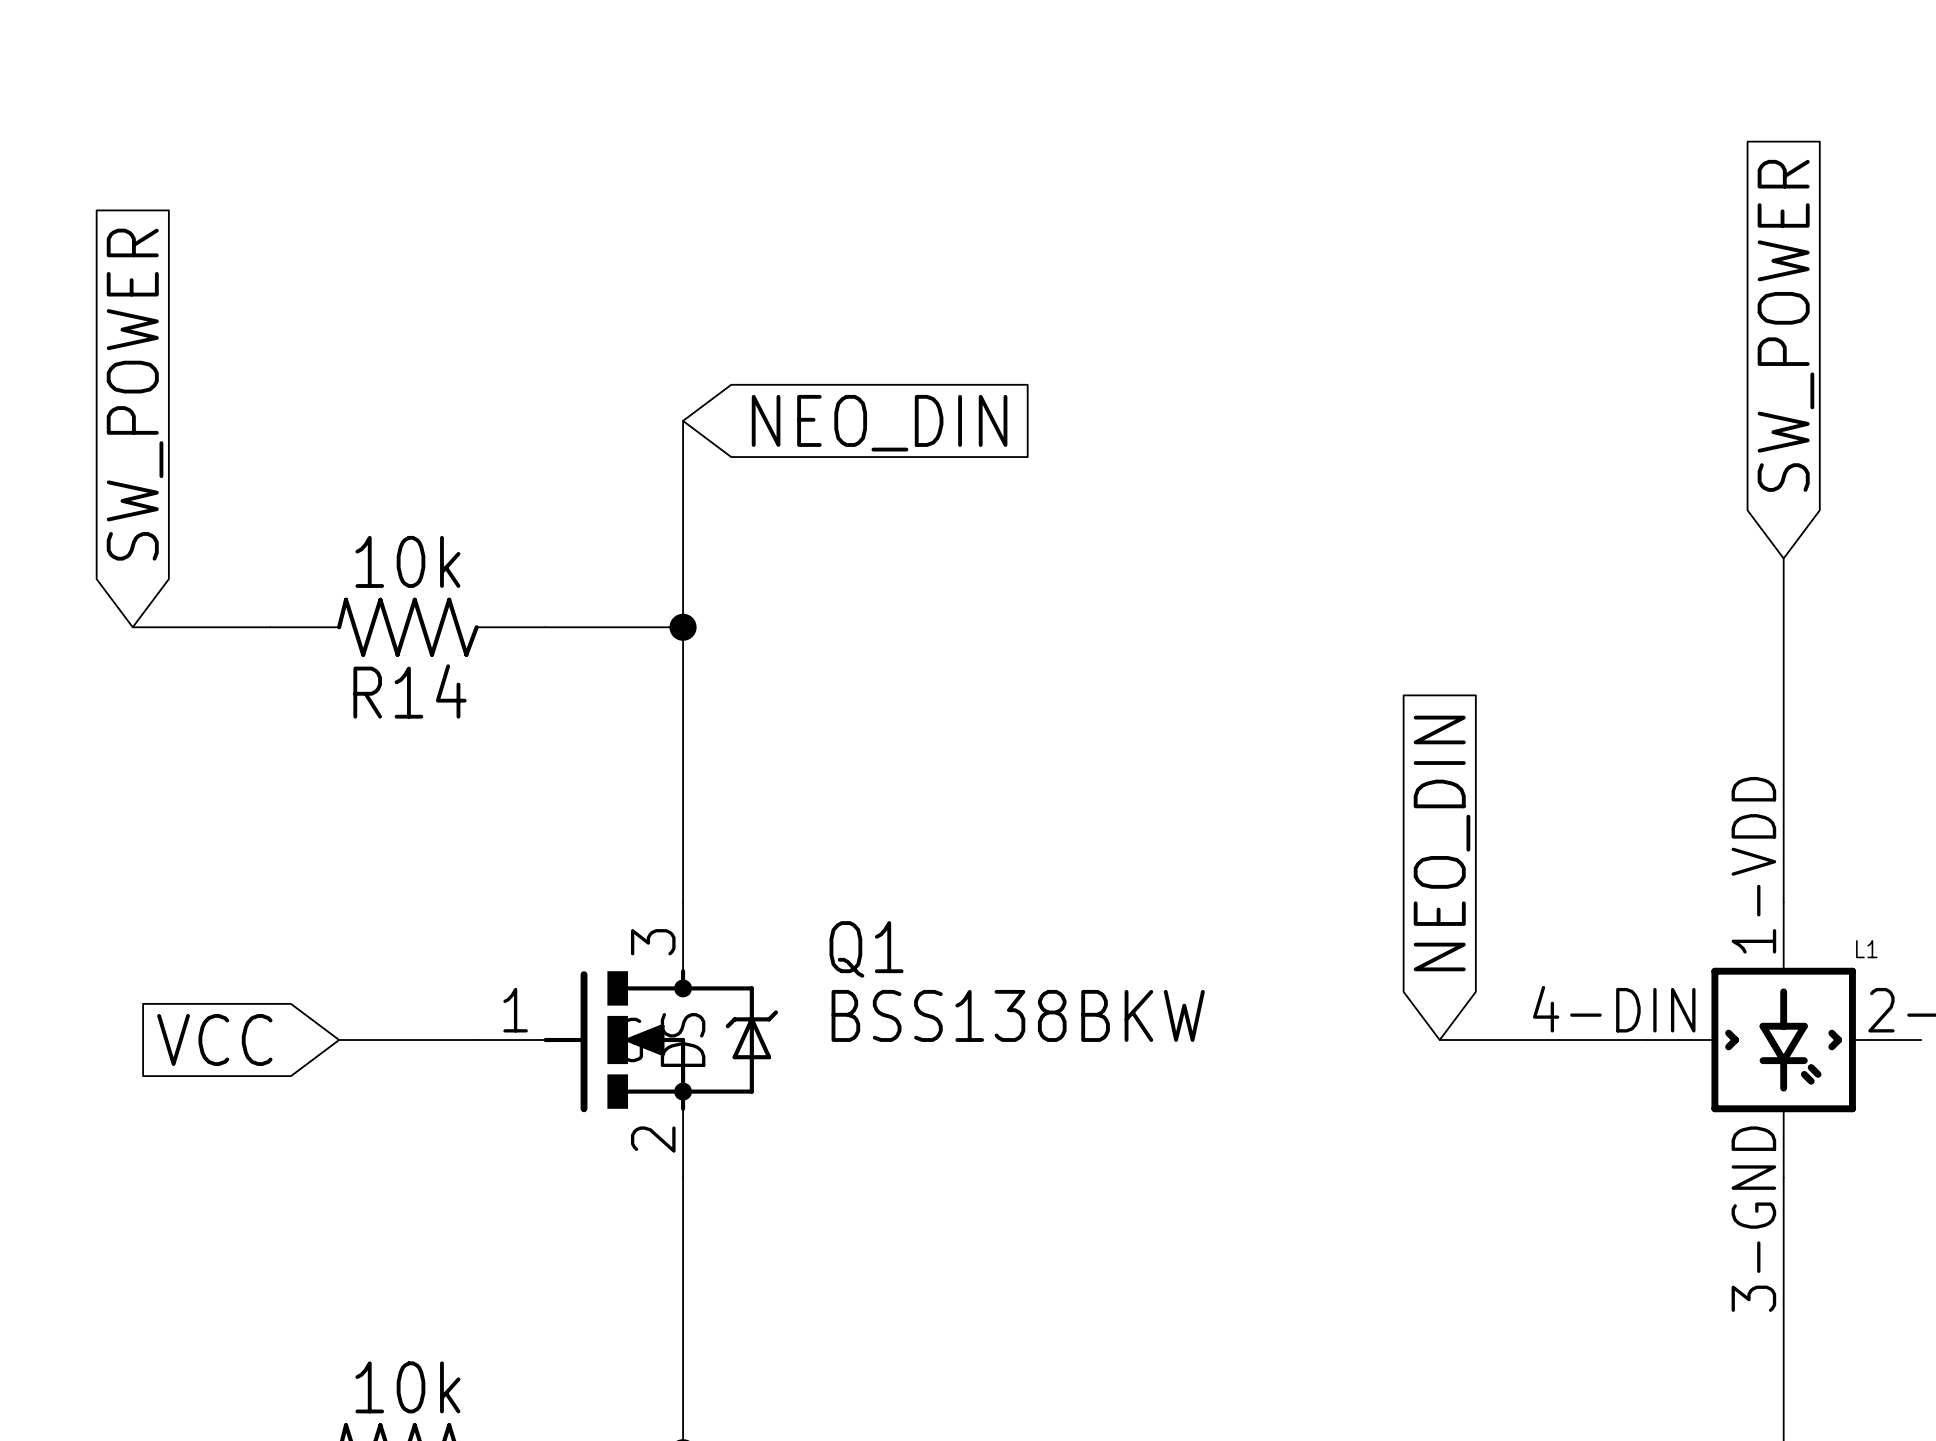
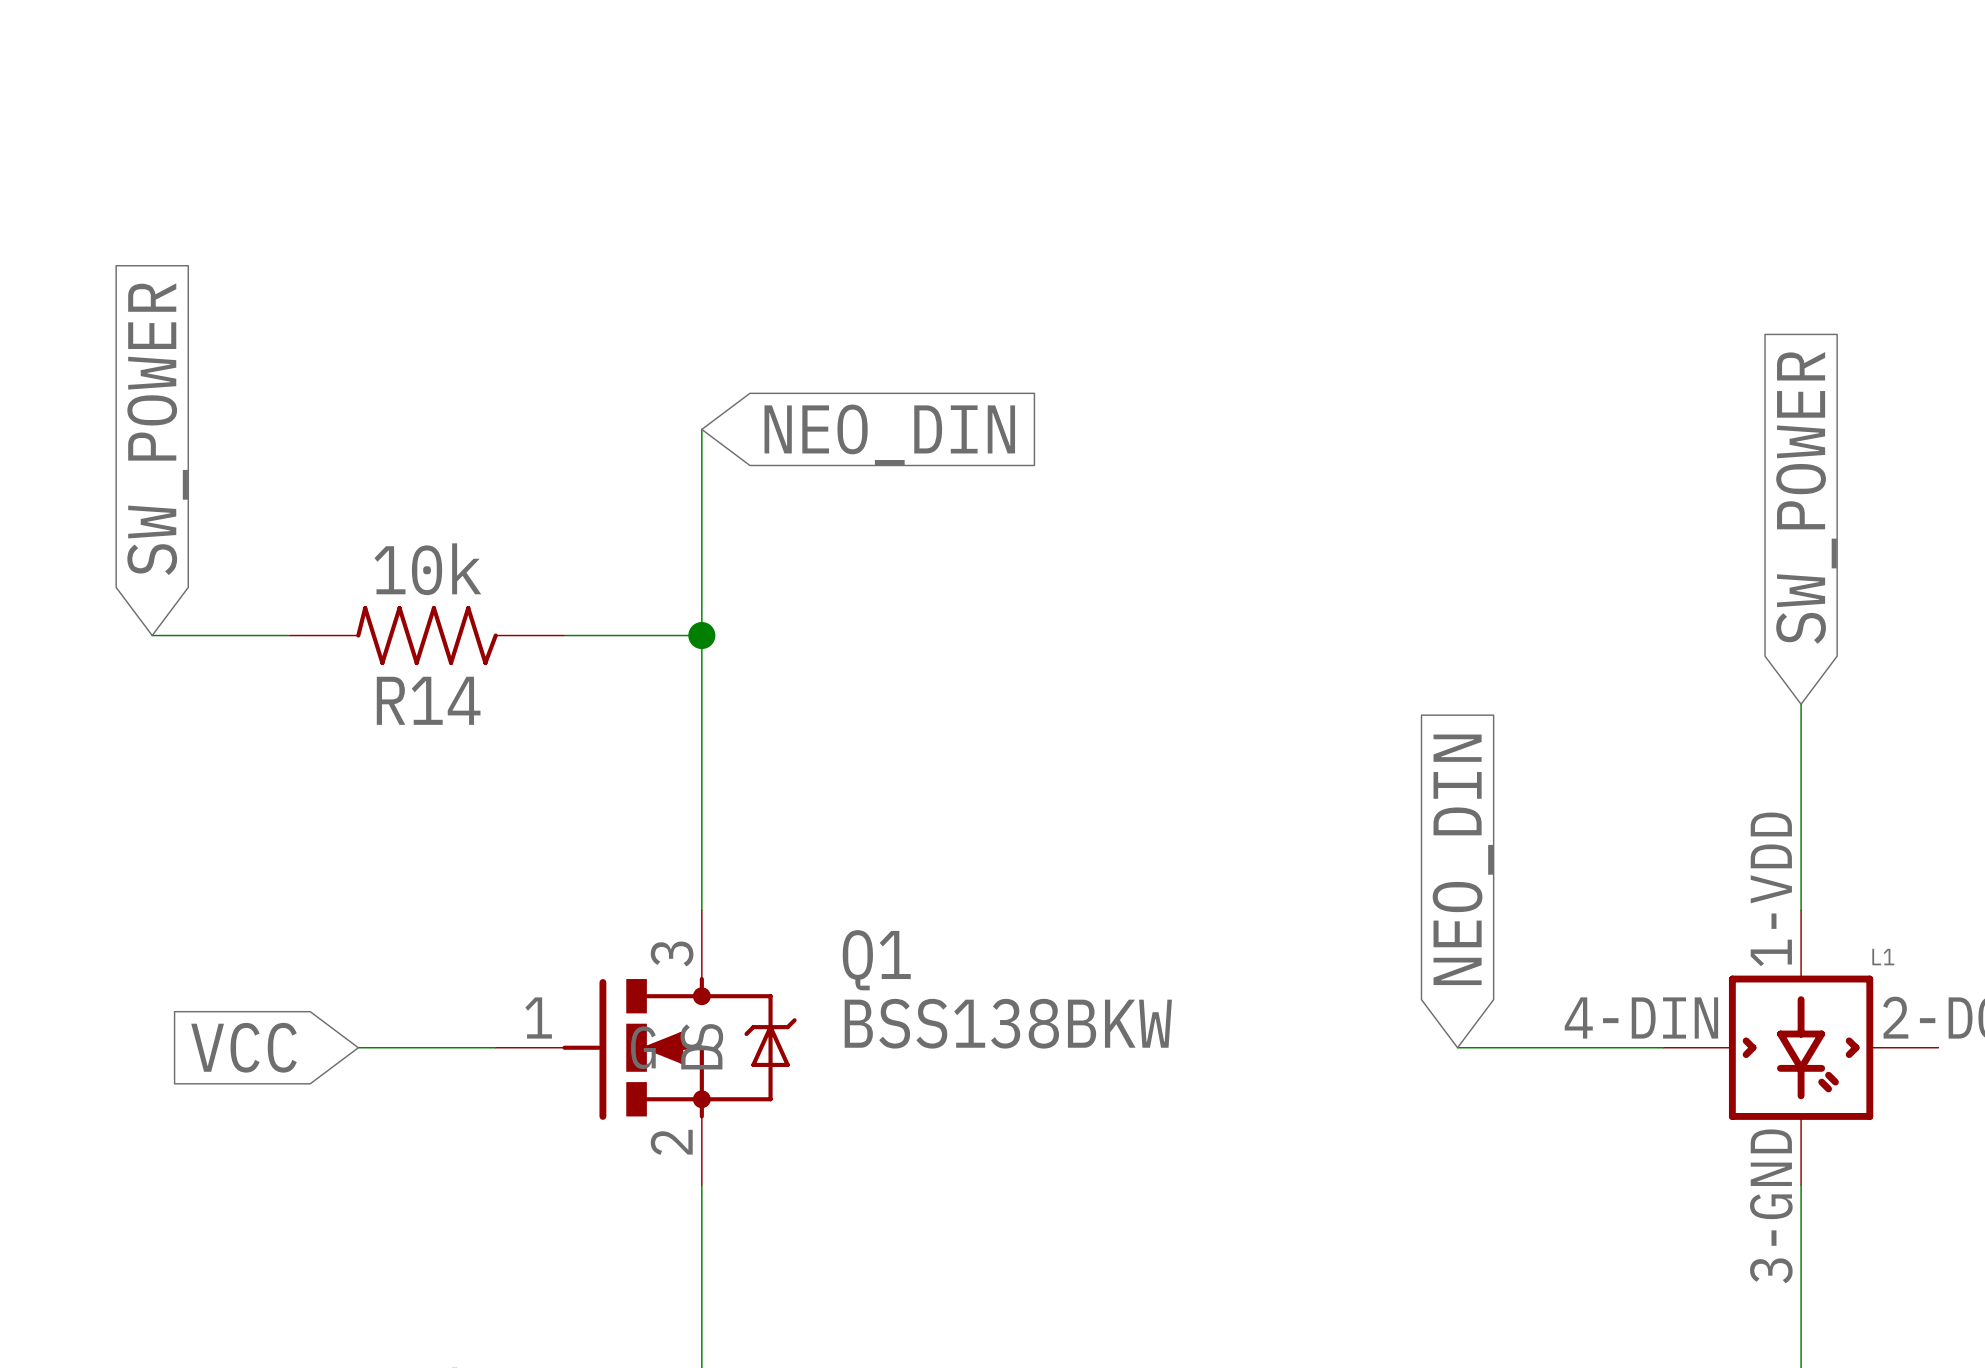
global label position: SW_POWER (1785, 325) -> SW_POWER (1806, 497)
wire: (1783, 558) (1783, 696) -> none

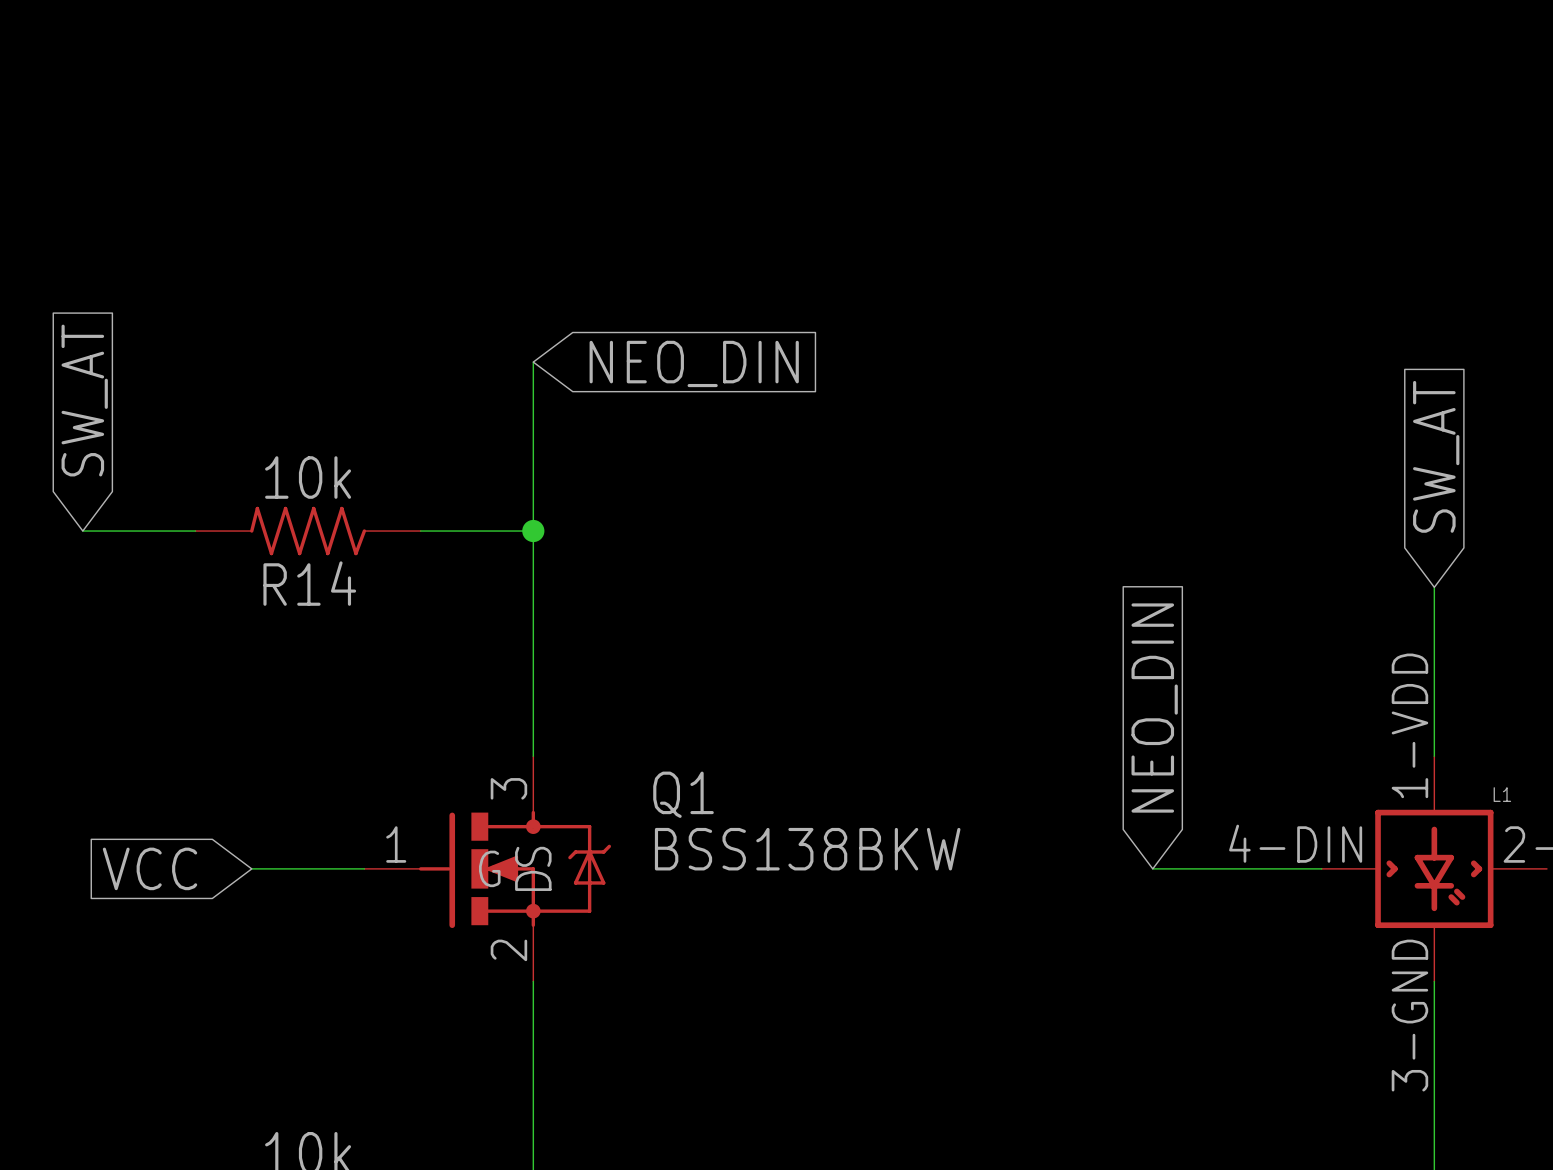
global label: SW_POWER (157, 429) -> SW_AT (84, 400)
global label: SW_POWER (1806, 497) -> SW_AT (1436, 456)

